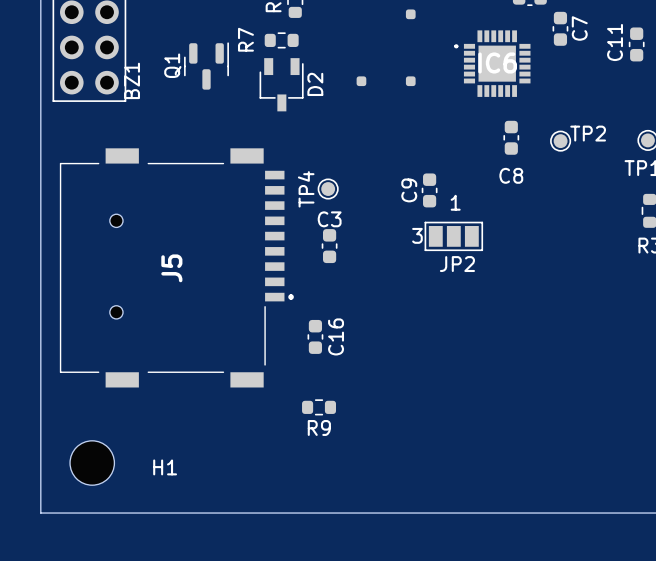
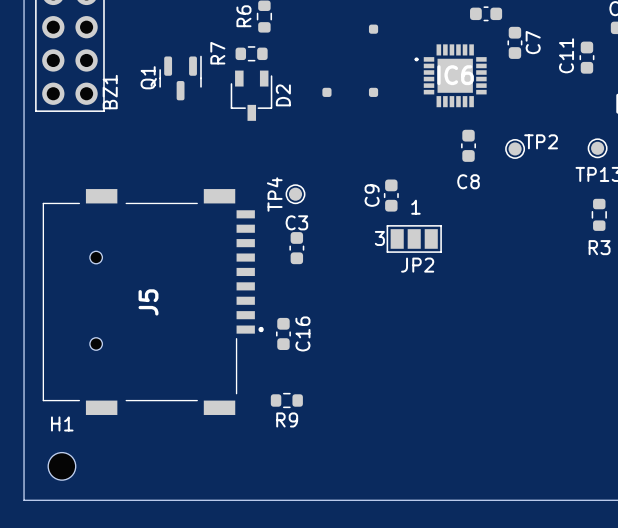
J5 position: (176, 267) -> (153, 302)
H1 footprint: [70, 440, 115, 486] -> [48, 452, 76, 481]
H1 name position: H1 (165, 467) -> H1 (62, 423)

